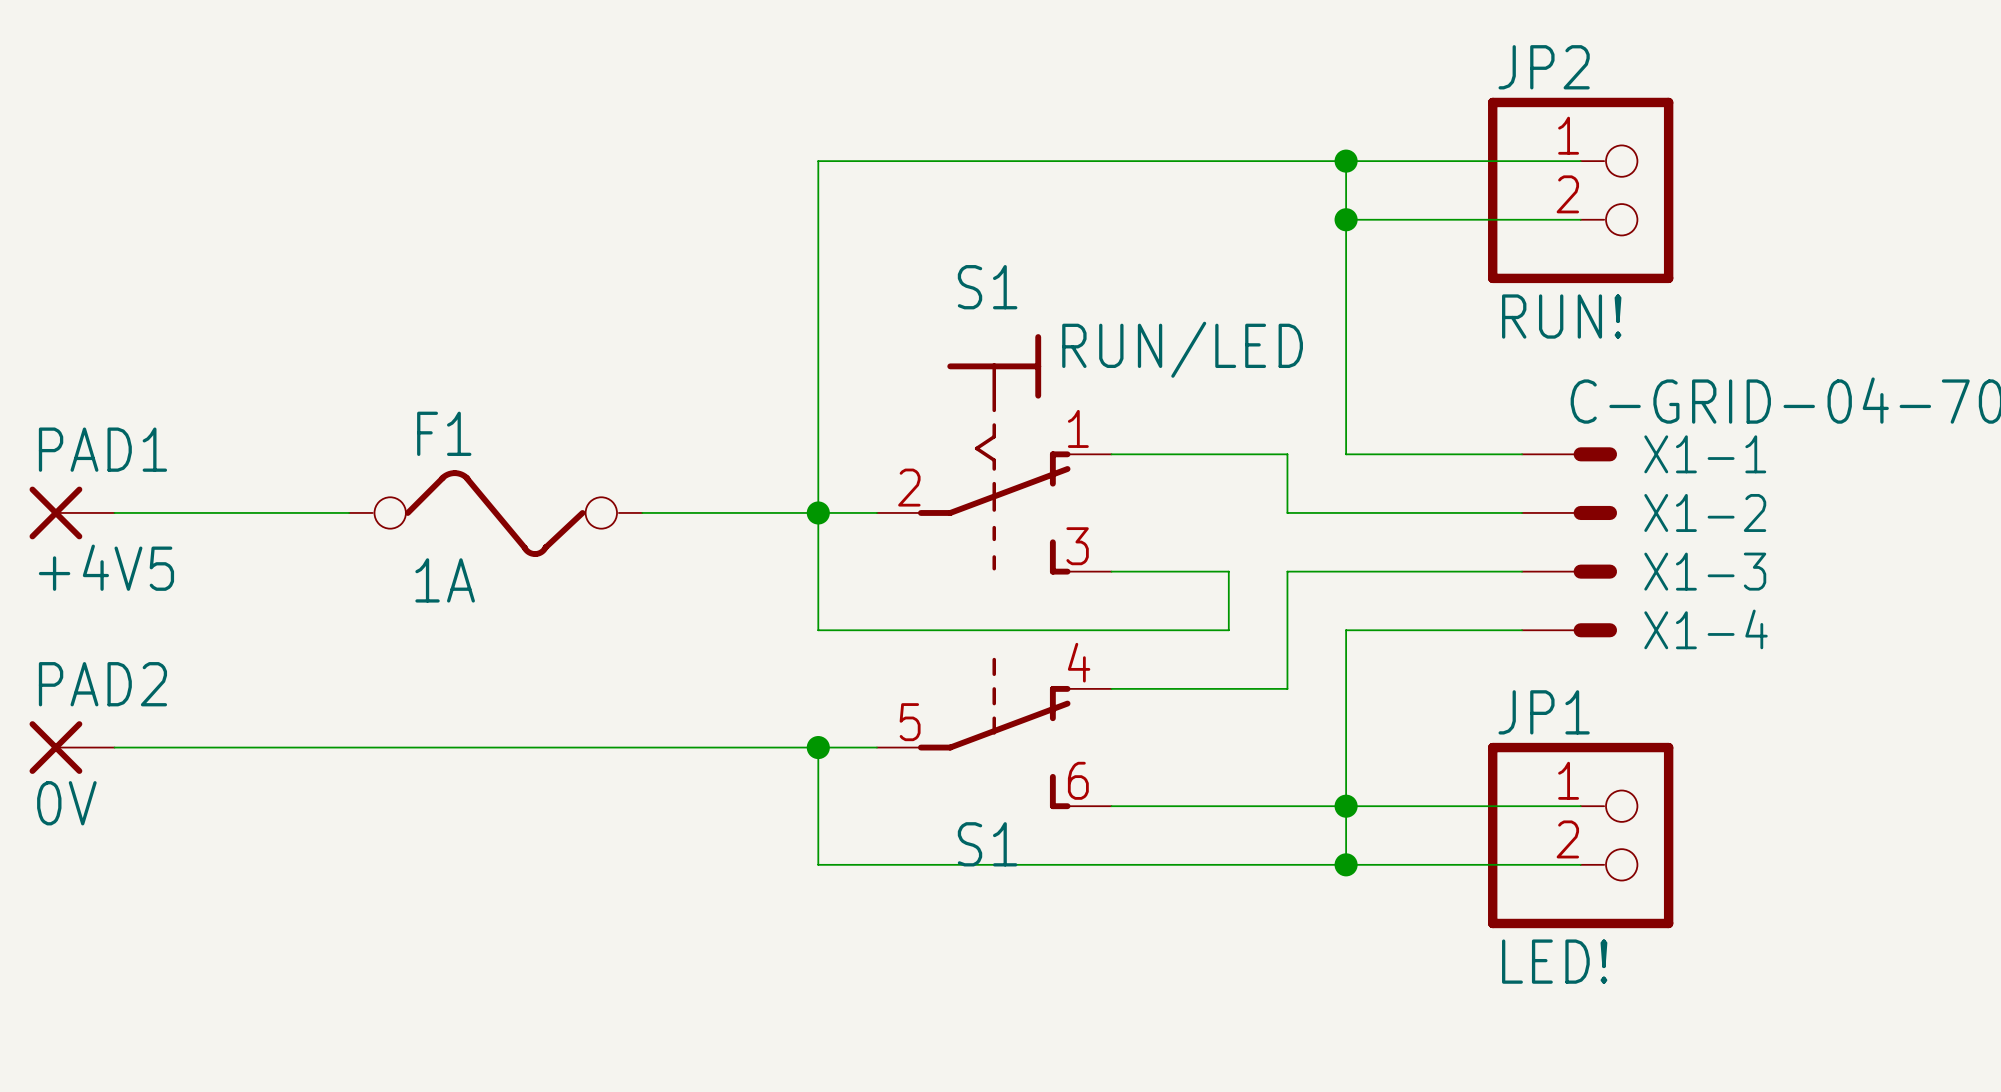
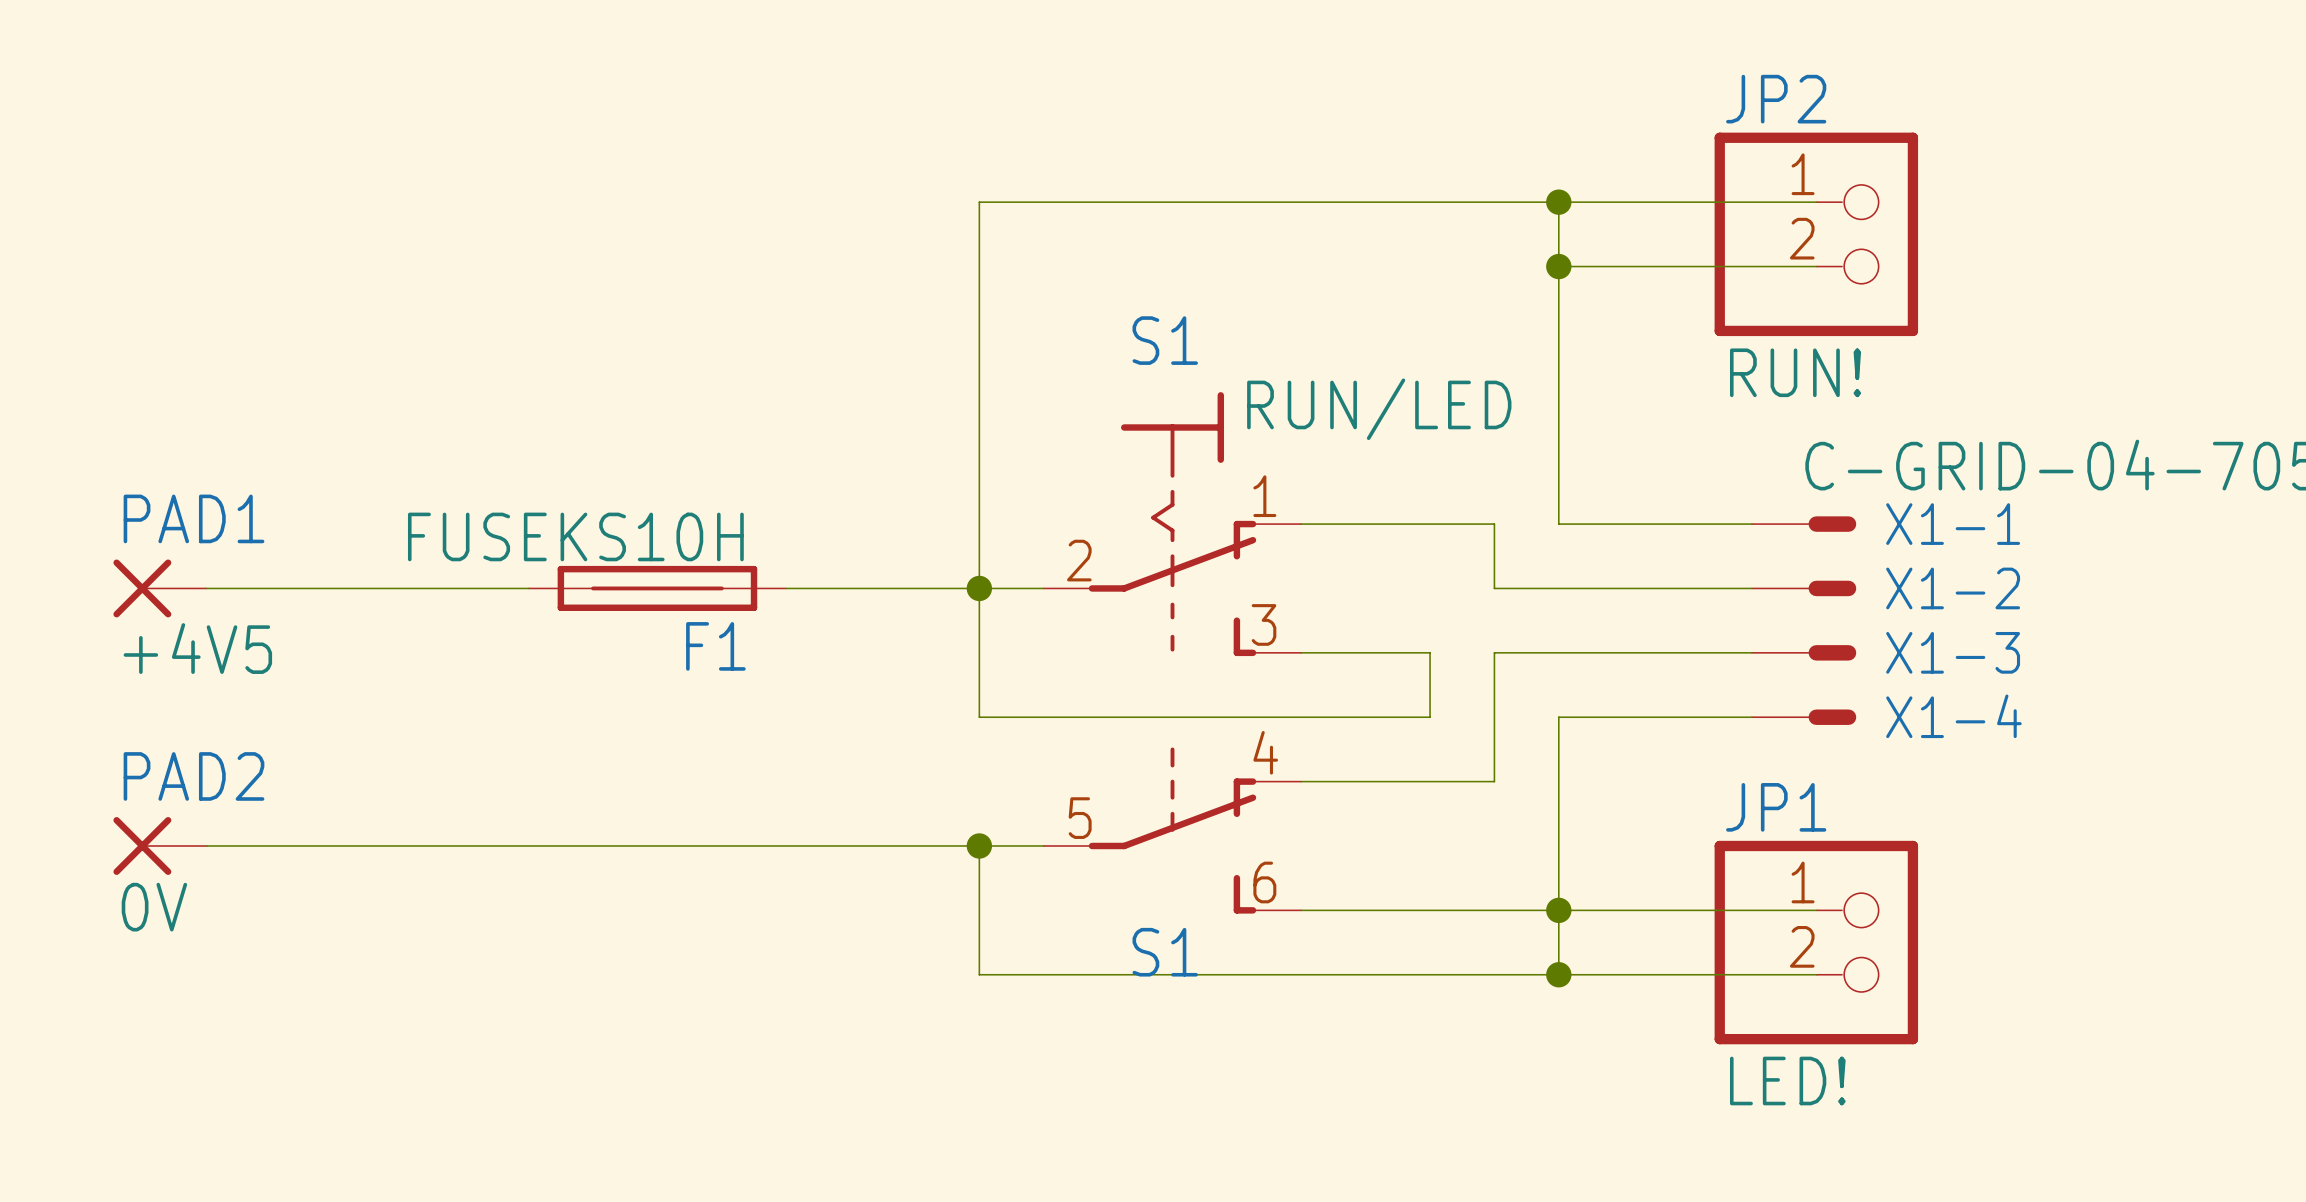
F1 name position: F1 (444, 433) -> F1 (715, 646)
F1 symbol: [349, 470, 643, 557] -> [528, 565, 787, 611]
wire: none -> (464, 588) (528, 588)
F1 value: 1A (445, 580) -> FUSEKS10H (575, 536)

